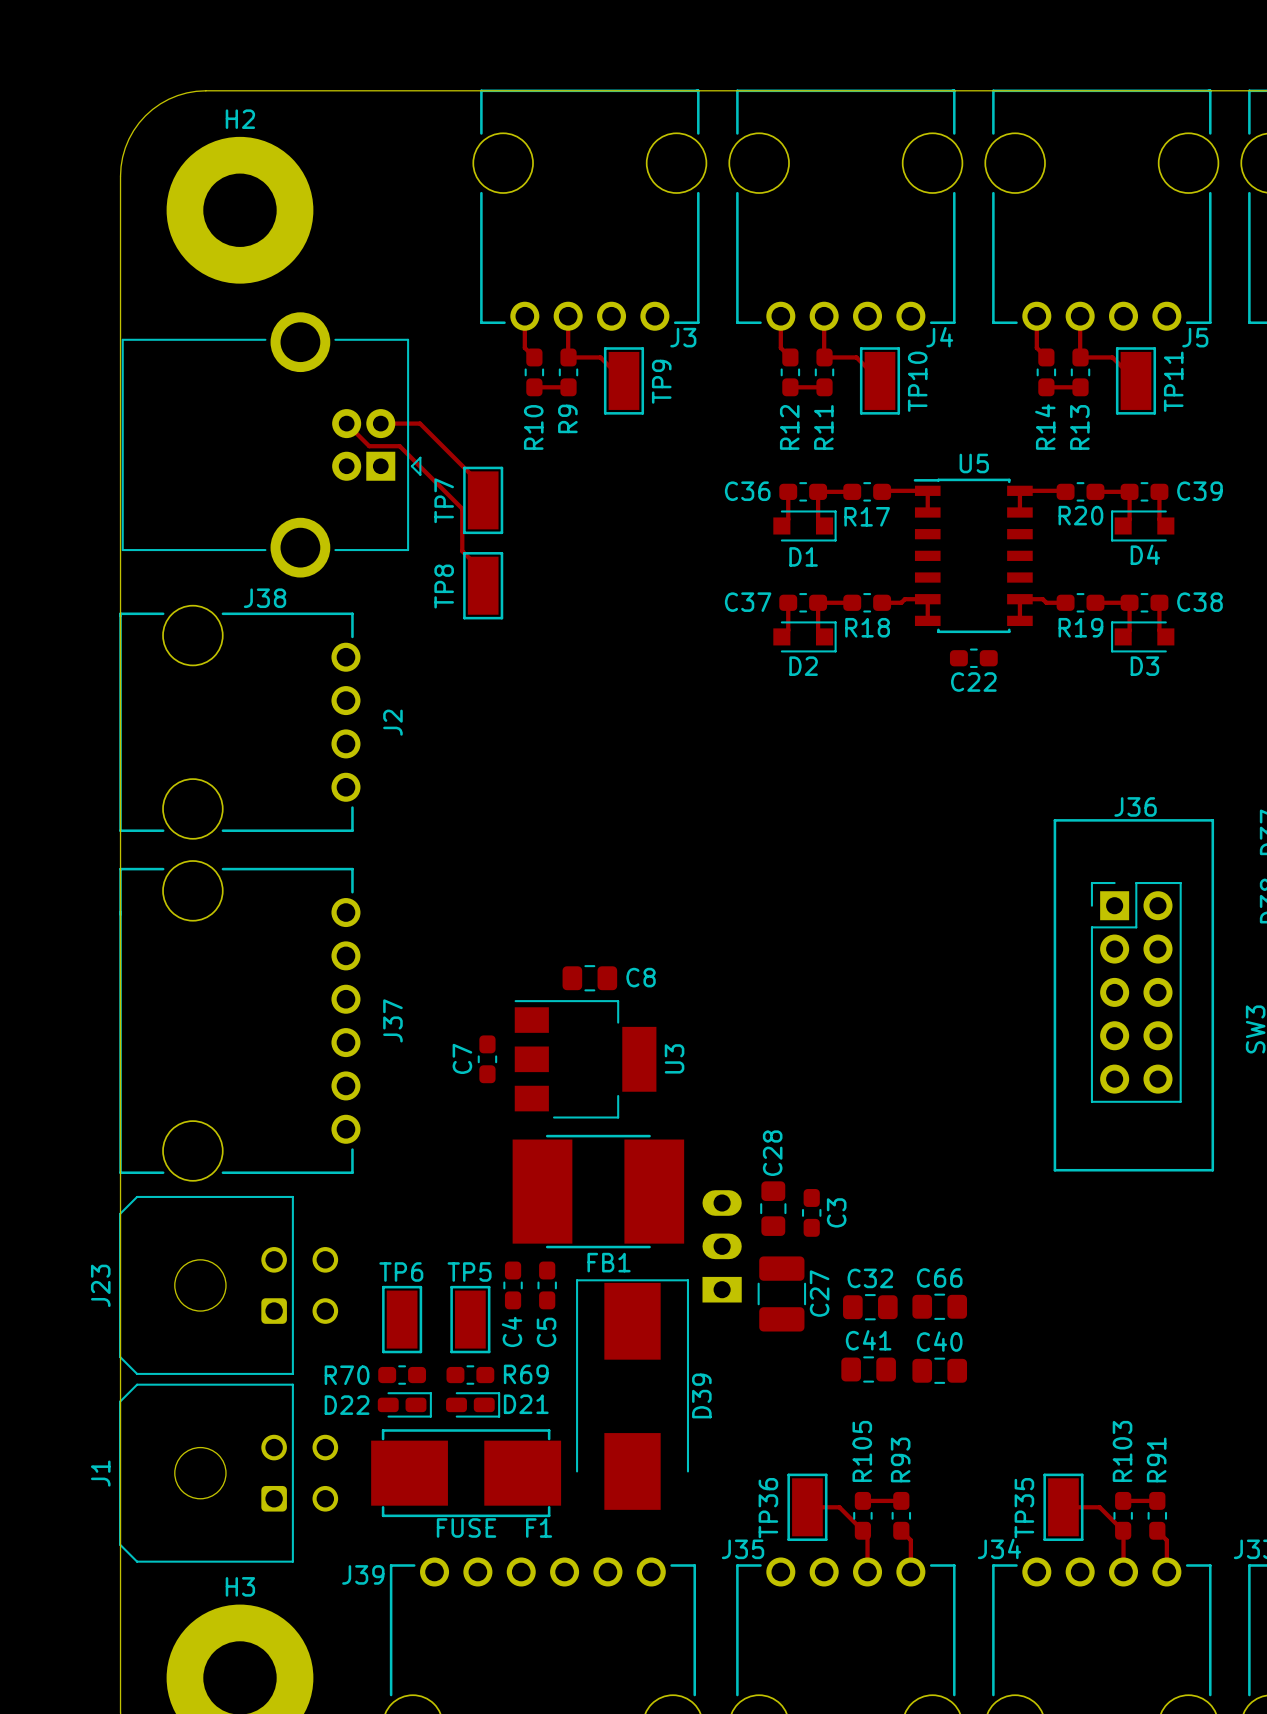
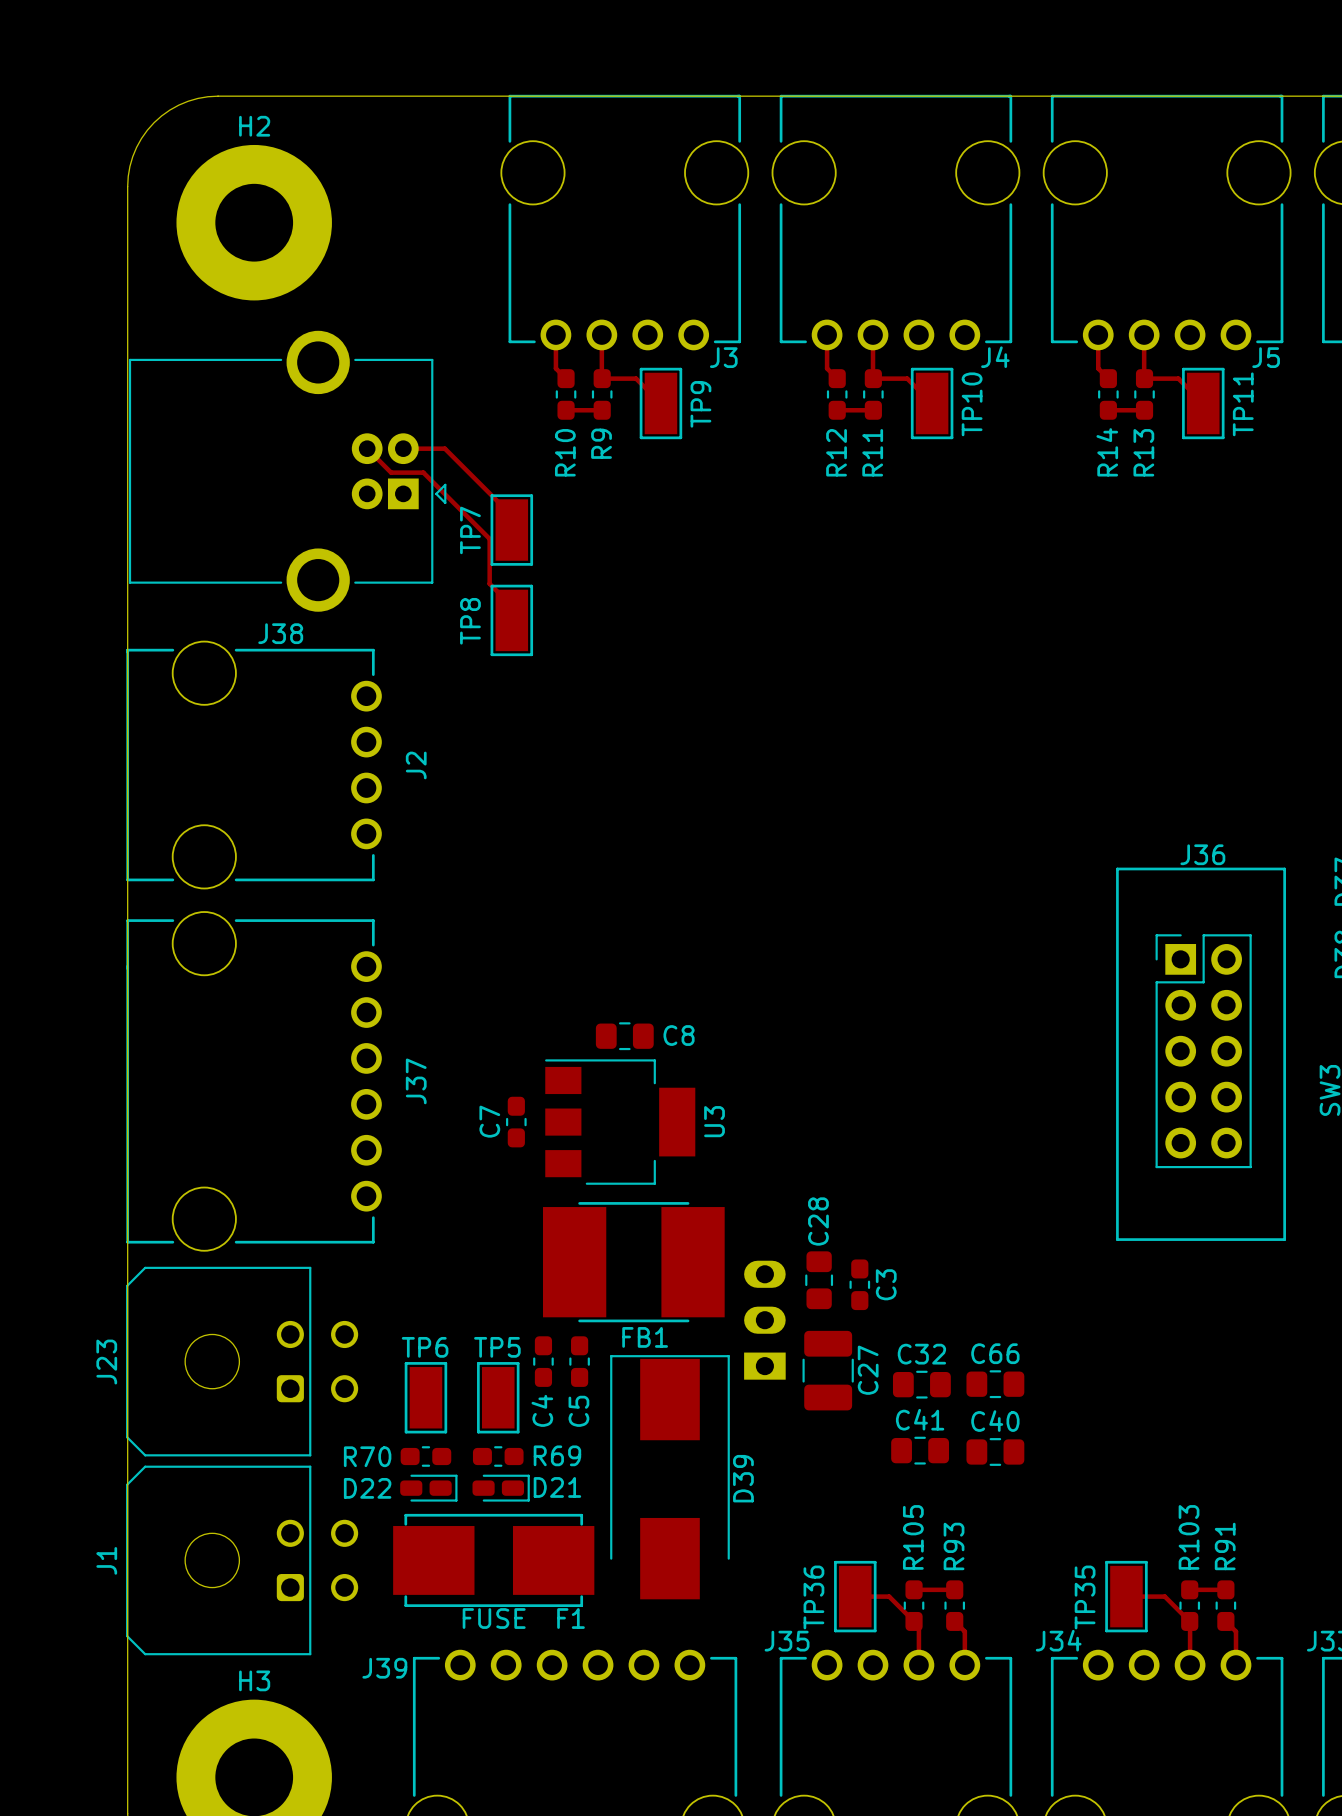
track: (788, 491) (788, 519) (781, 525) -> none
C36: (803, 491) -> none
track: (852, 491) (818, 491) (818, 519) (824, 525) -> none
R17: (867, 491) -> none
track: (882, 491) (927, 490) (927, 512) -> none
track: (1065, 491) (1019, 490) (1019, 512) -> none
R20: (1080, 491) -> none
track: (1095, 491) (1129, 491) (1129, 519) (1123, 525) -> none
C39: (1144, 491) -> none
track: (1159, 491) (1159, 519) (1165, 525) -> none
D1: (804, 525) -> none
D4: (1142, 525) -> none
U5: (973, 555) -> none
track: (788, 602) (788, 630) (781, 636) -> none
C37: (803, 602) -> none
track: (852, 602) (818, 602) (818, 630) (824, 636) -> none
R18: (867, 602) -> none
track: (882, 602) (901, 602) (904, 599) (927, 599) (927, 620) -> none
track: (1065, 602) (1046, 602) (1042, 599) (1019, 599) (1019, 620) -> none
R19: (1080, 602) -> none
track: (1095, 602) (1129, 602) (1129, 630) (1123, 636) -> none
C38: (1144, 602) -> none
track: (1159, 602) (1159, 630) (1165, 636) -> none
D2: (804, 636) -> none
D3: (1142, 636) -> none
C22: (973, 658) -> none

